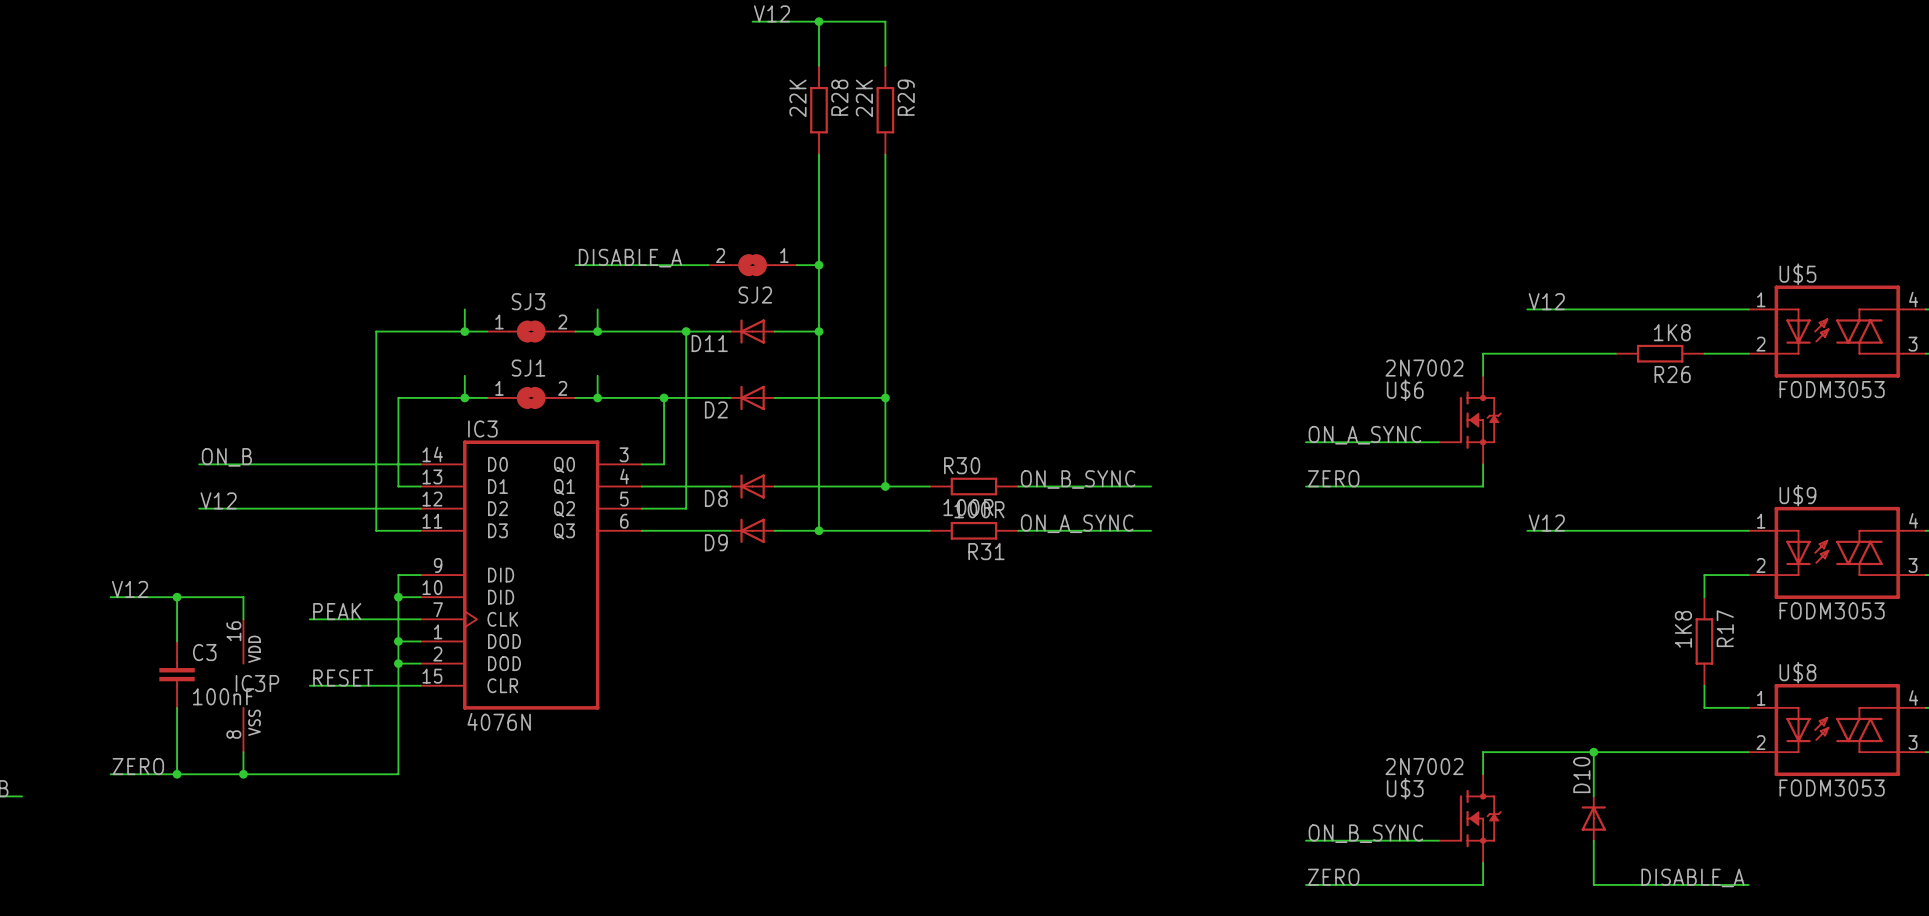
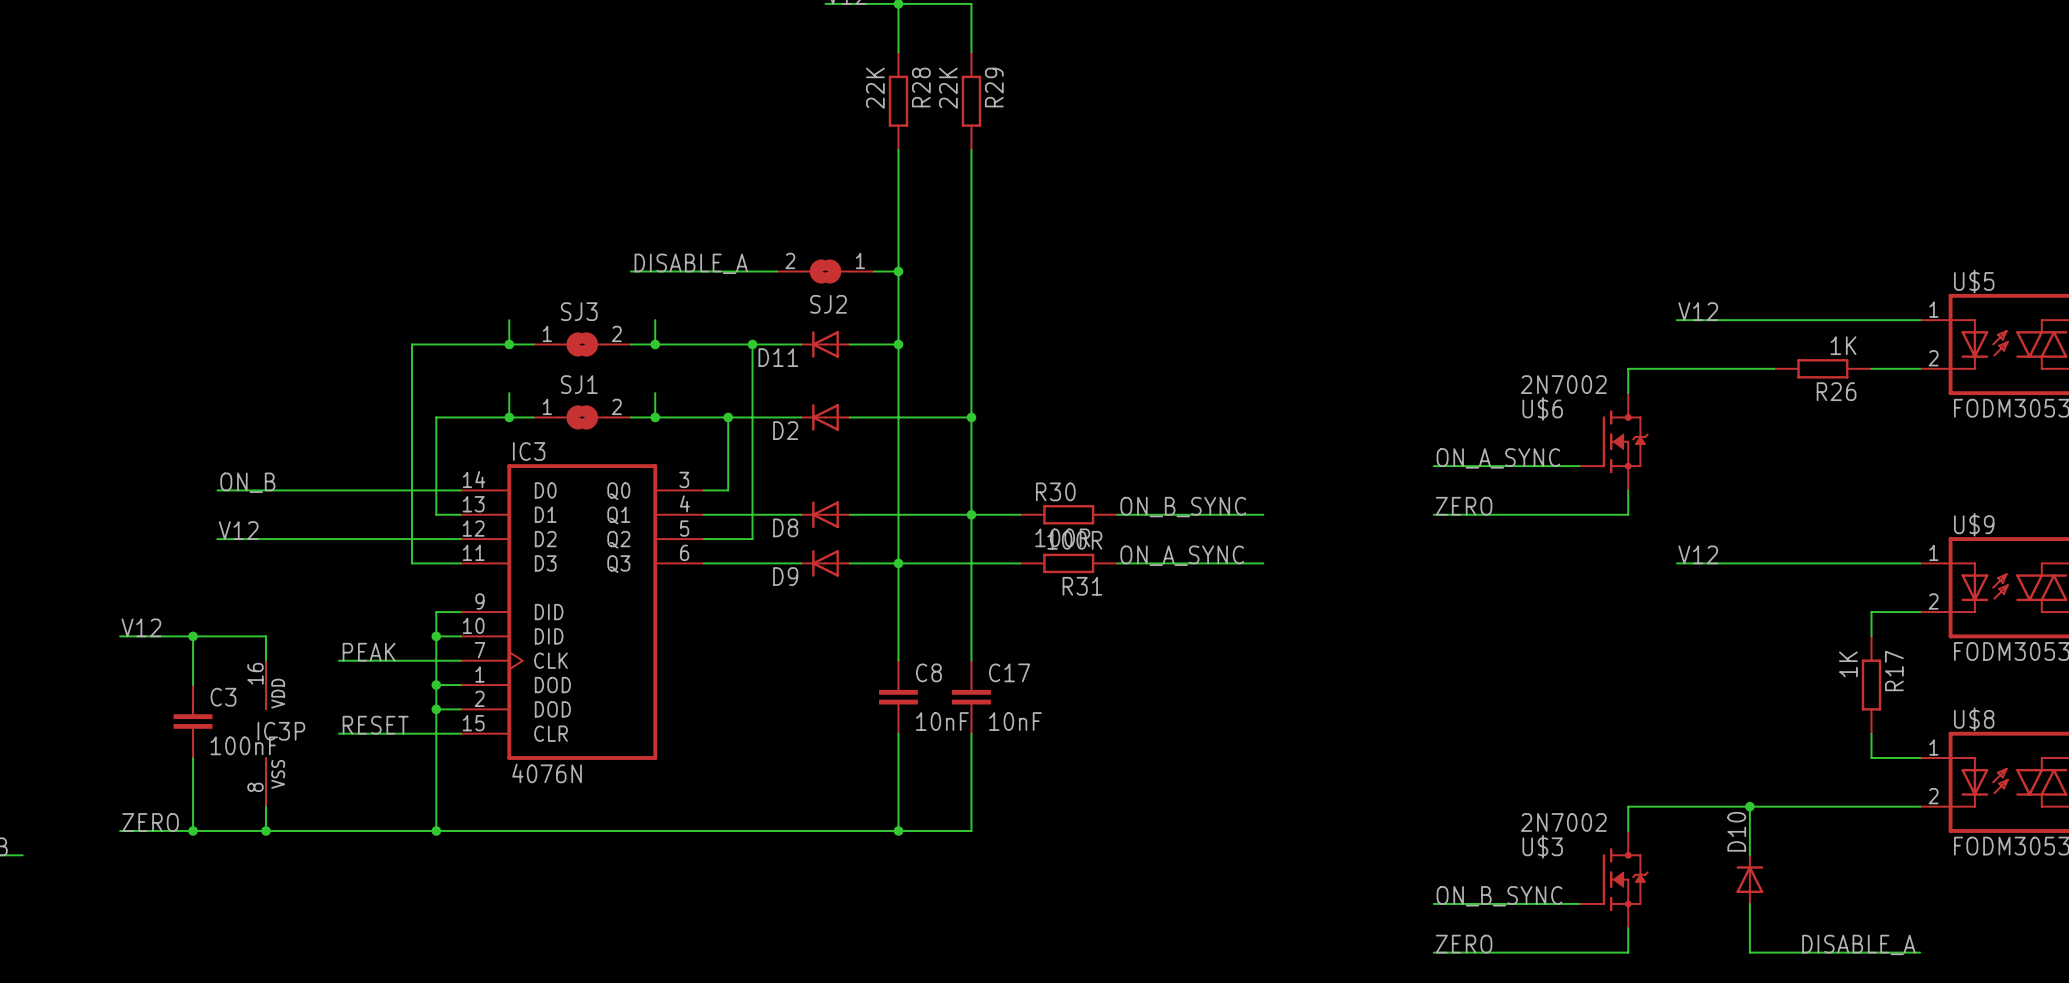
R26 value: 1K8 (1672, 332) -> 1K (1843, 345)
wire: none -> (971, 514) (971, 660)
wire: none -> (898, 563) (898, 660)
R17 value: 1K8 (1683, 629) -> 1K (1848, 664)
C8: none -> 10nF (898, 697)
C17: none -> 10nF (971, 697)
wire: none -> (898, 733) (898, 830)
wire: none -> (971, 733) (971, 830) (436, 830)
junction: none -> (436, 830)
junction: none -> (898, 830)

